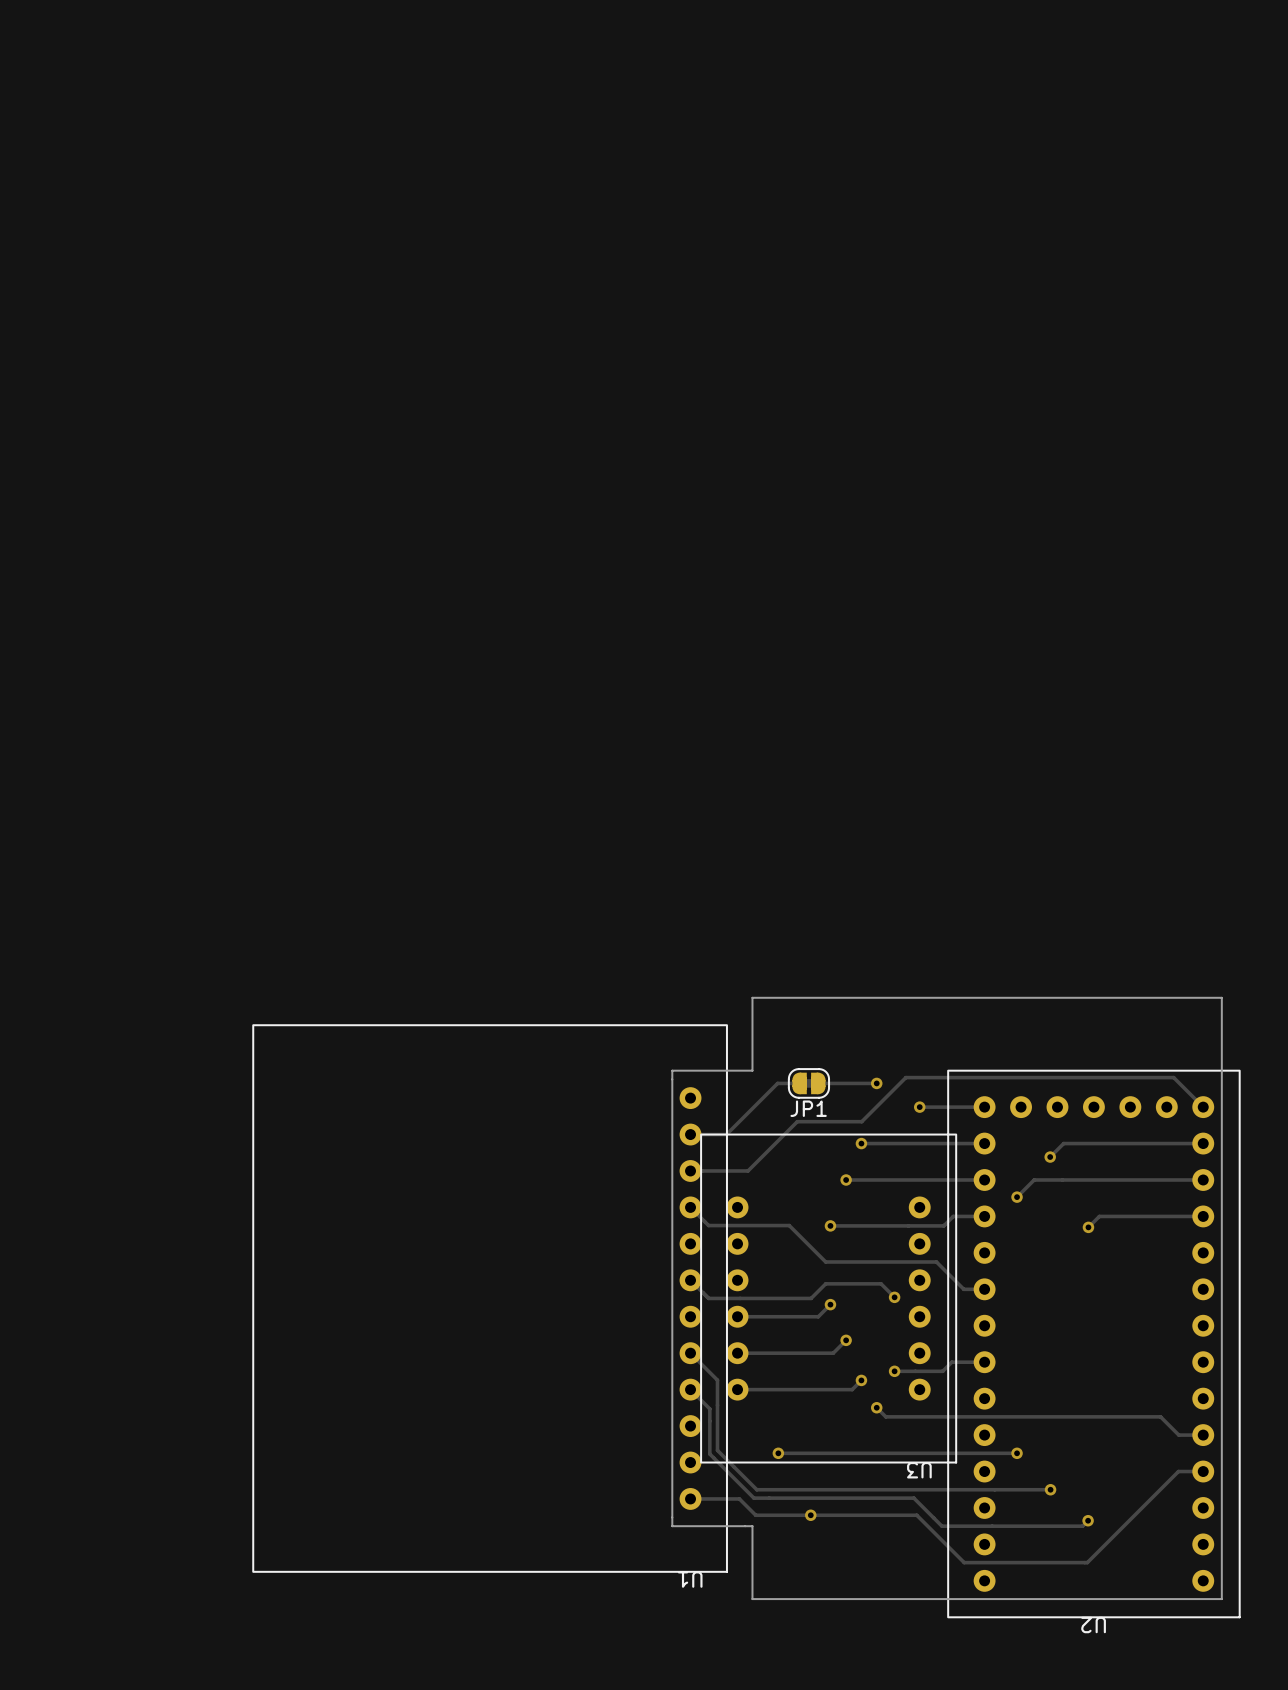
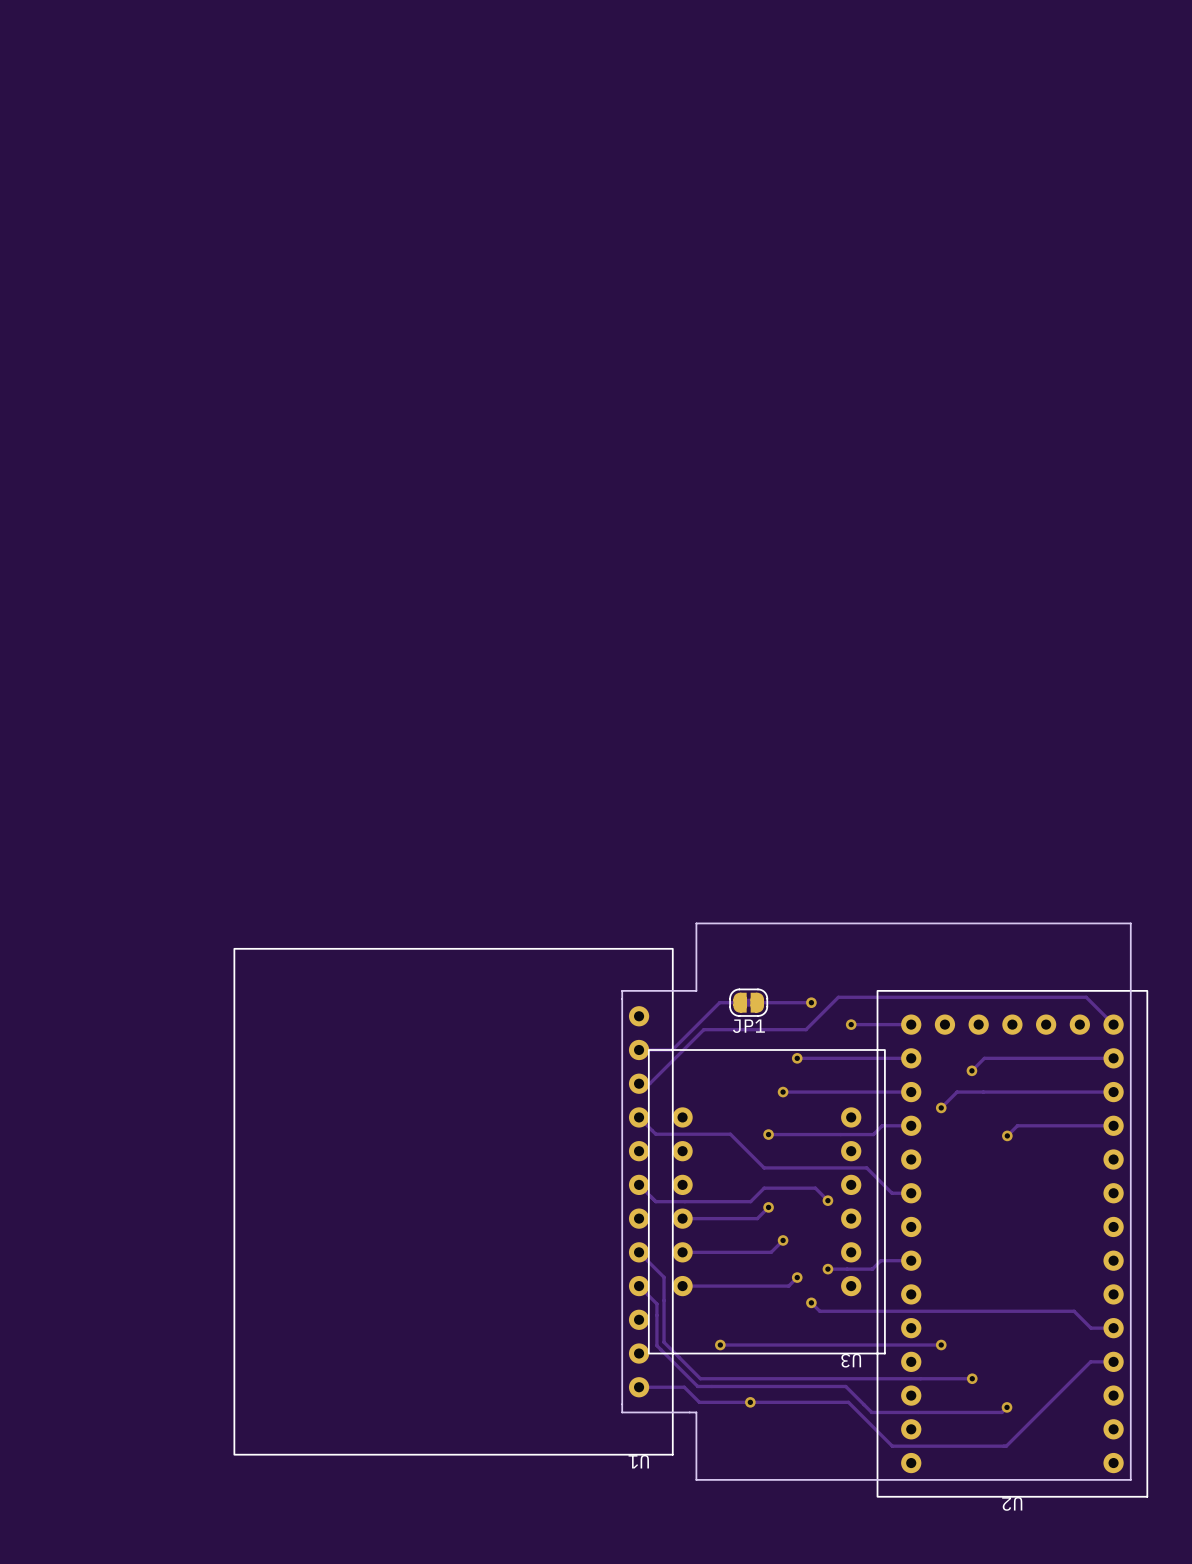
track: (870, 1112) (861, 1121) (797, 1121) (748, 1170) (702, 1170) -> (806, 1029) (703, 1029) (649, 1083)

